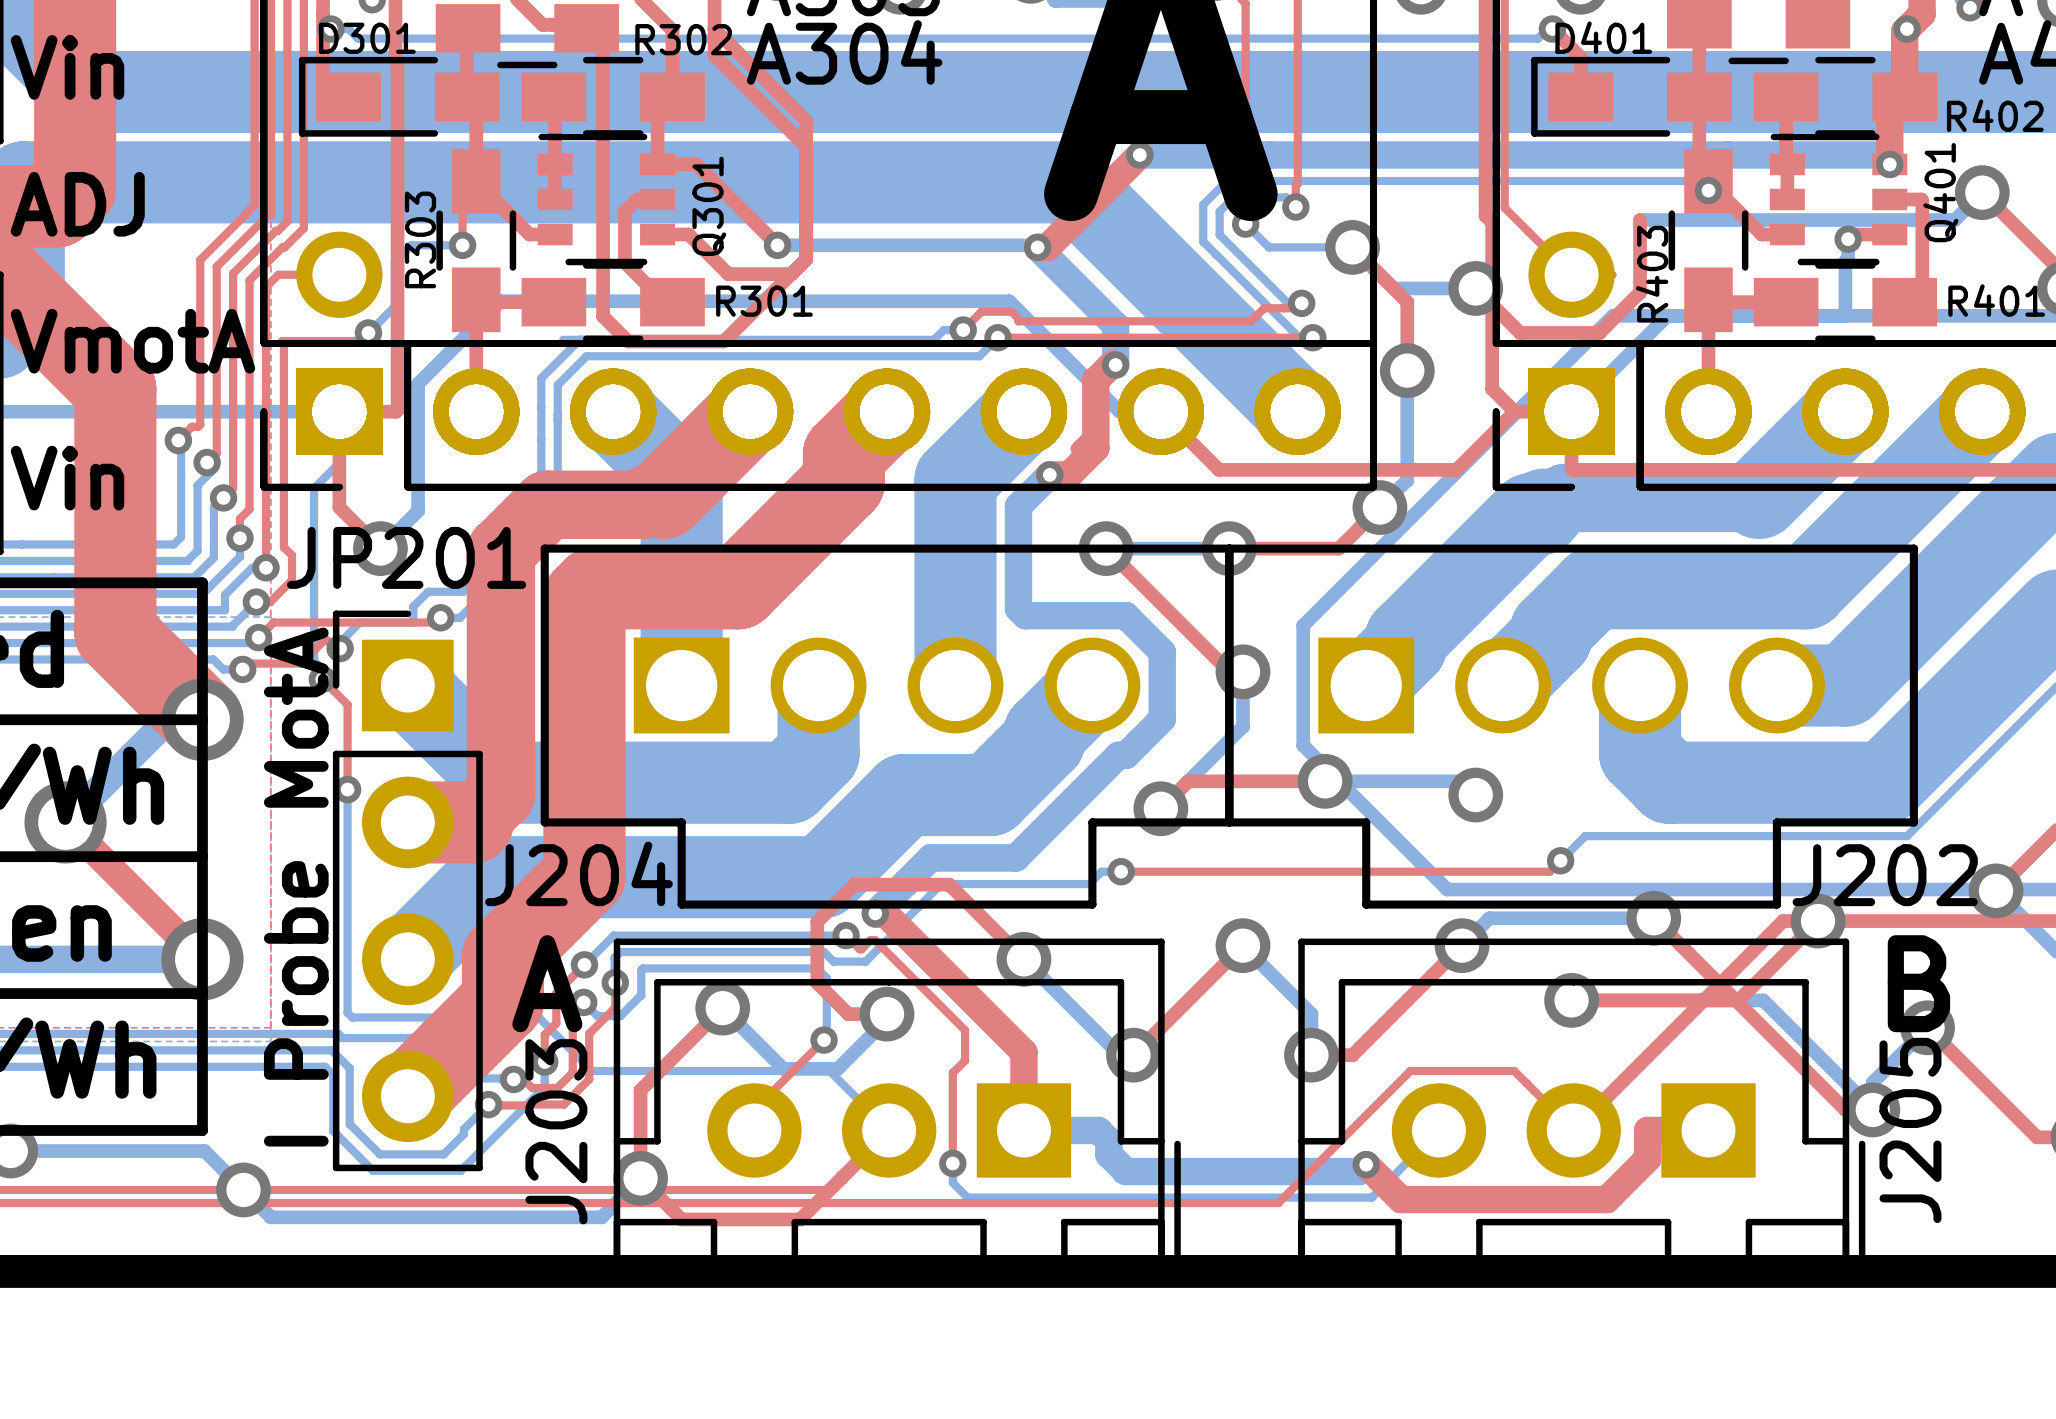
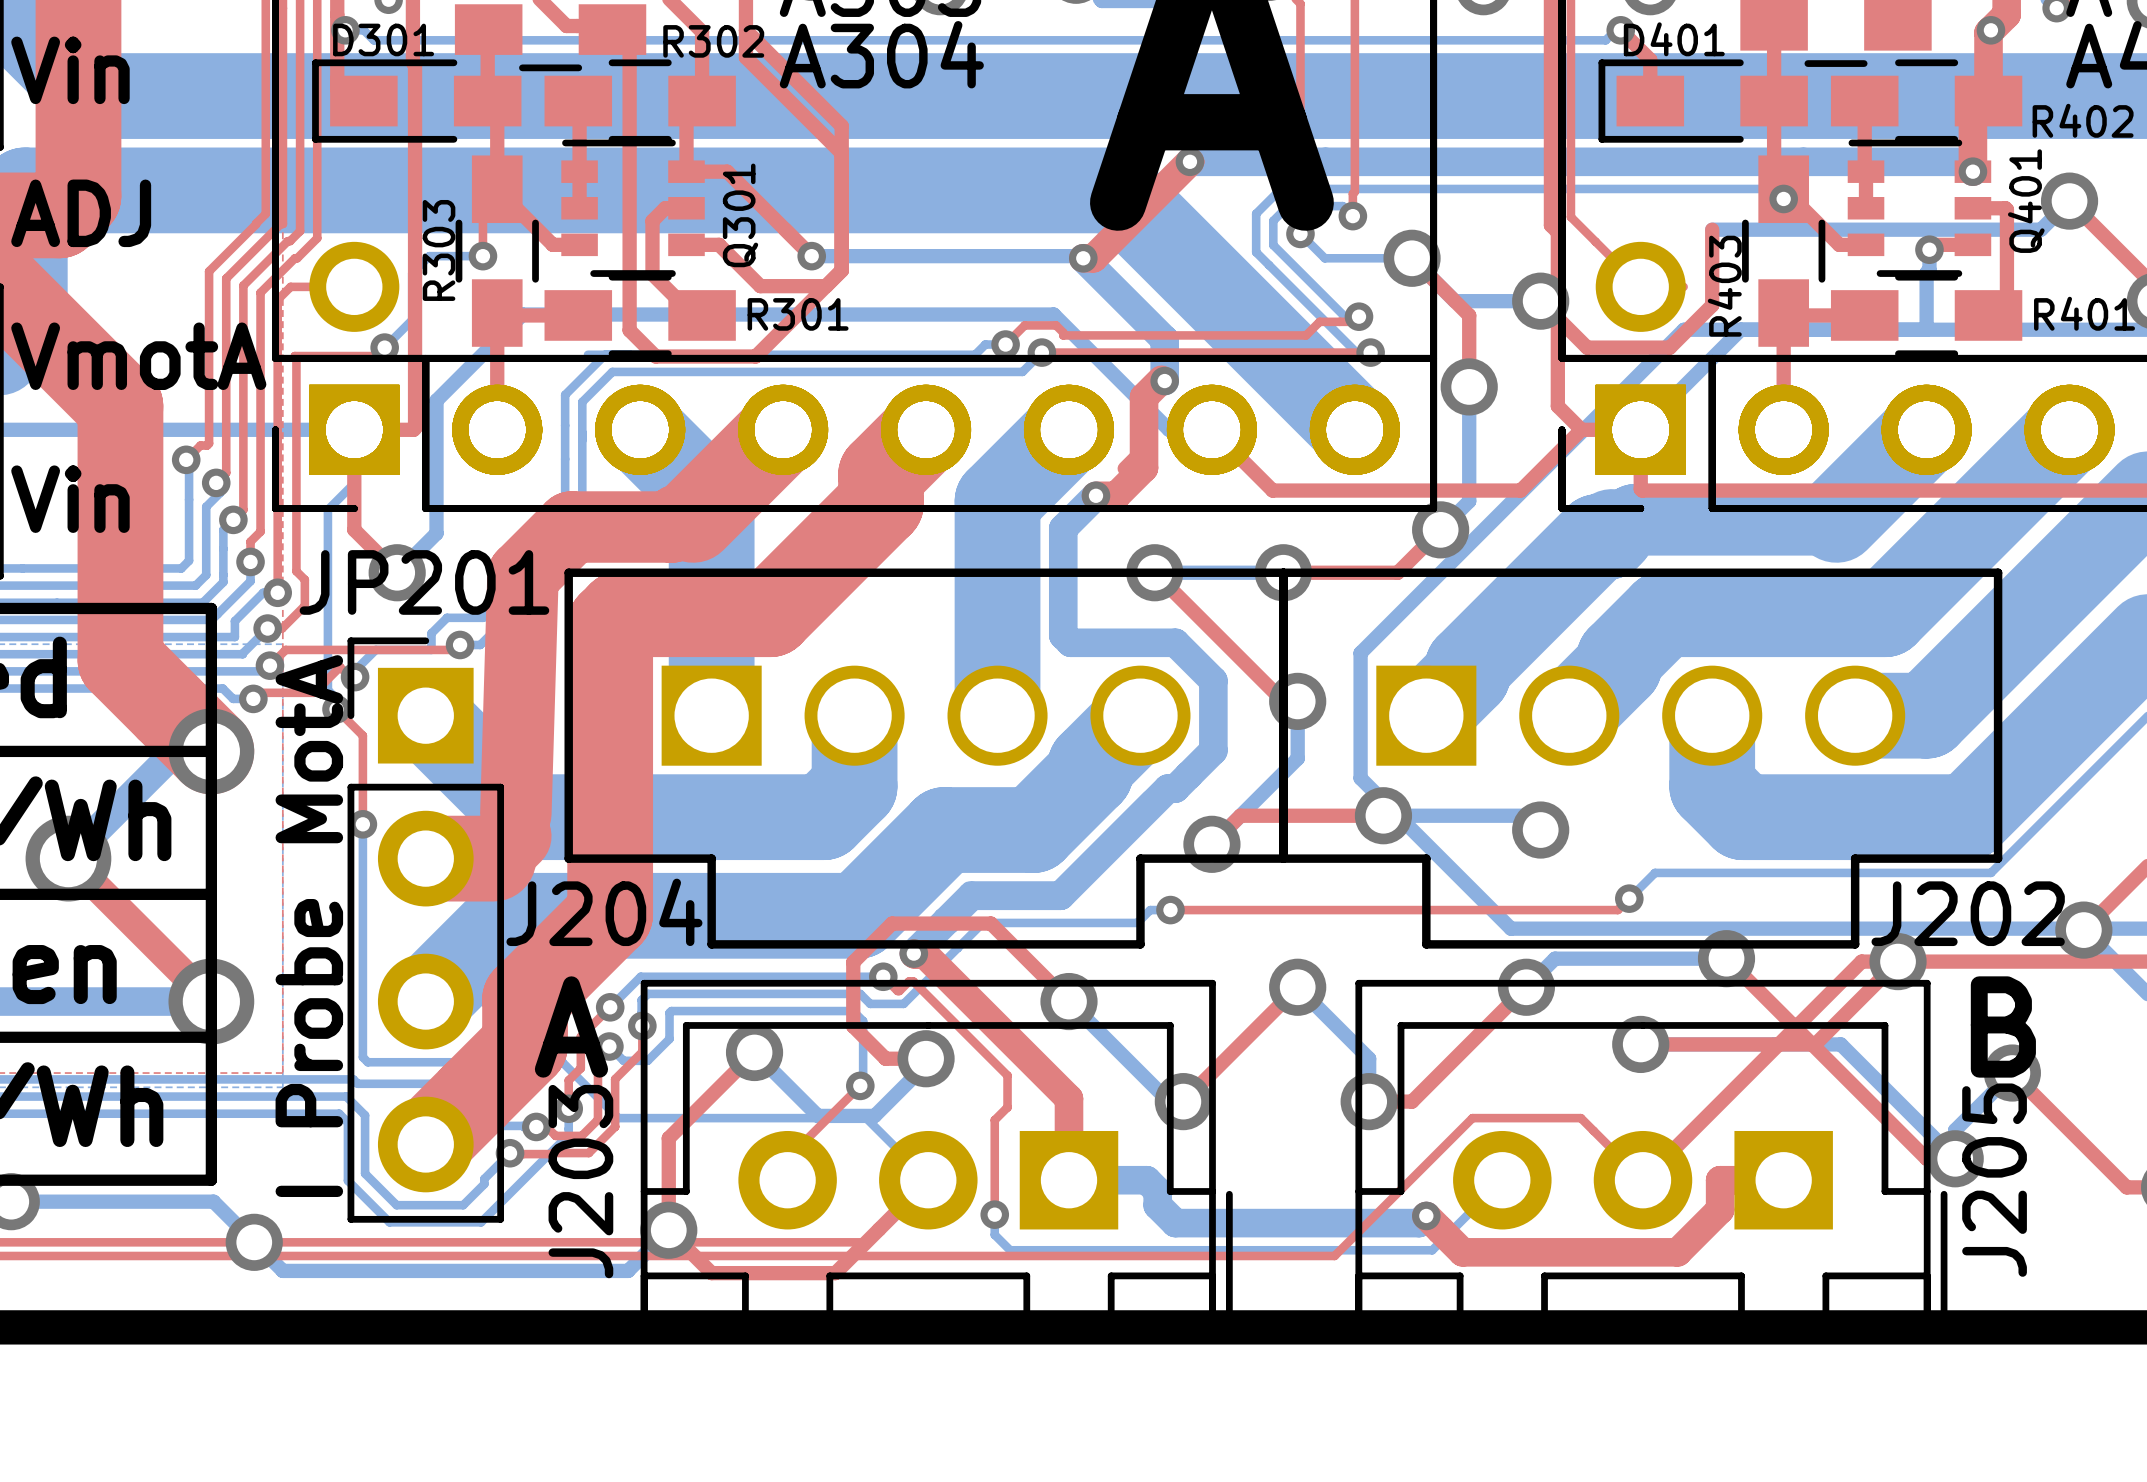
top track: (500, 551) (500, 794) (494, 800) -> (522, 575) (515, 813)

